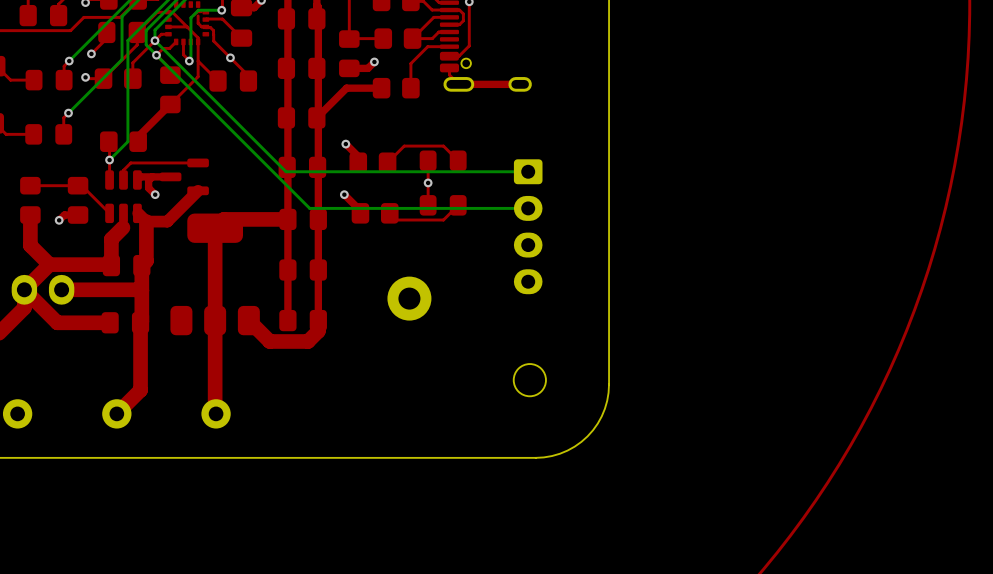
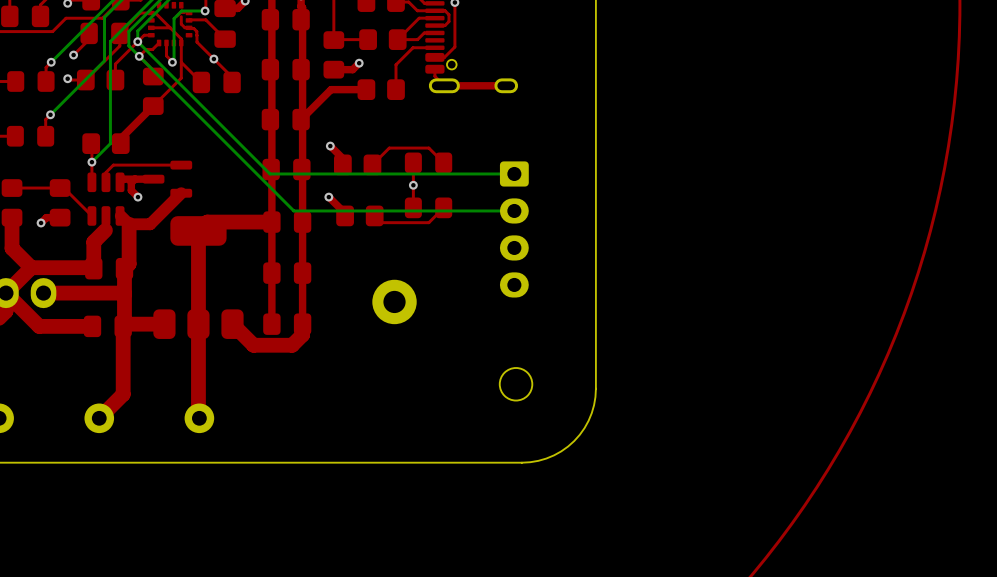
top track: none -> (164, 324) (125, 324)

